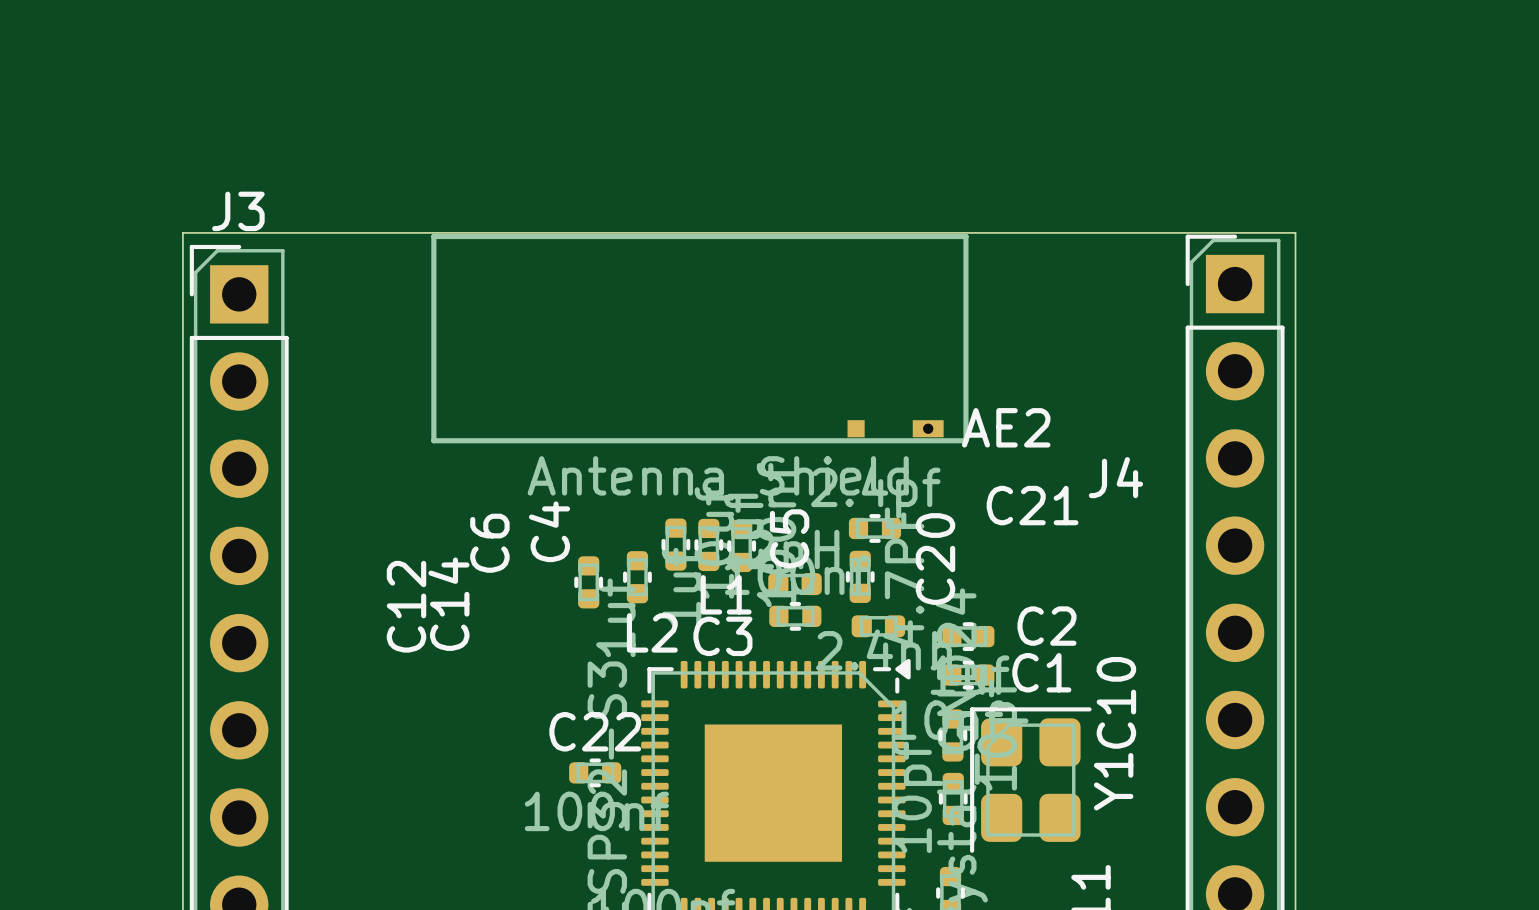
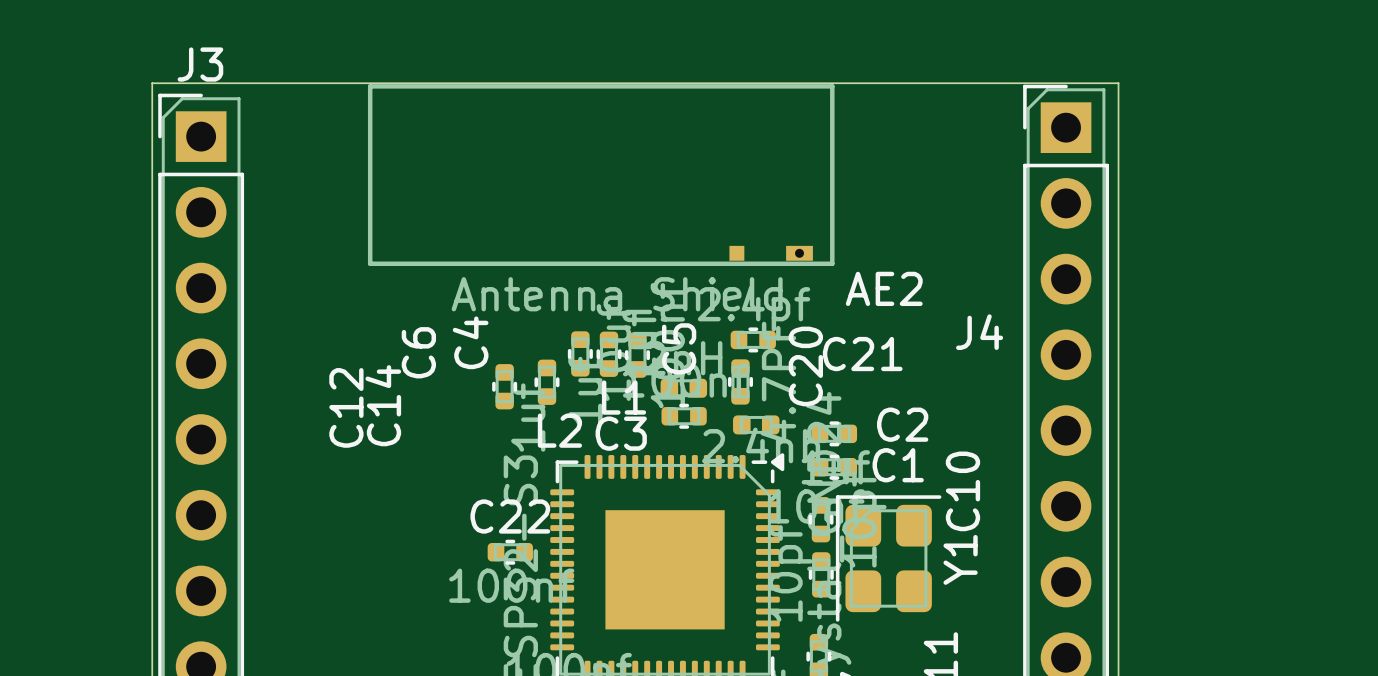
AE2 name position: AE2 (1006, 427) -> AE2 (884, 288)
J4 name position: J4 (1115, 477) -> J4 (979, 332)
C21 name position: C21 (1032, 505) -> C21 (862, 354)

